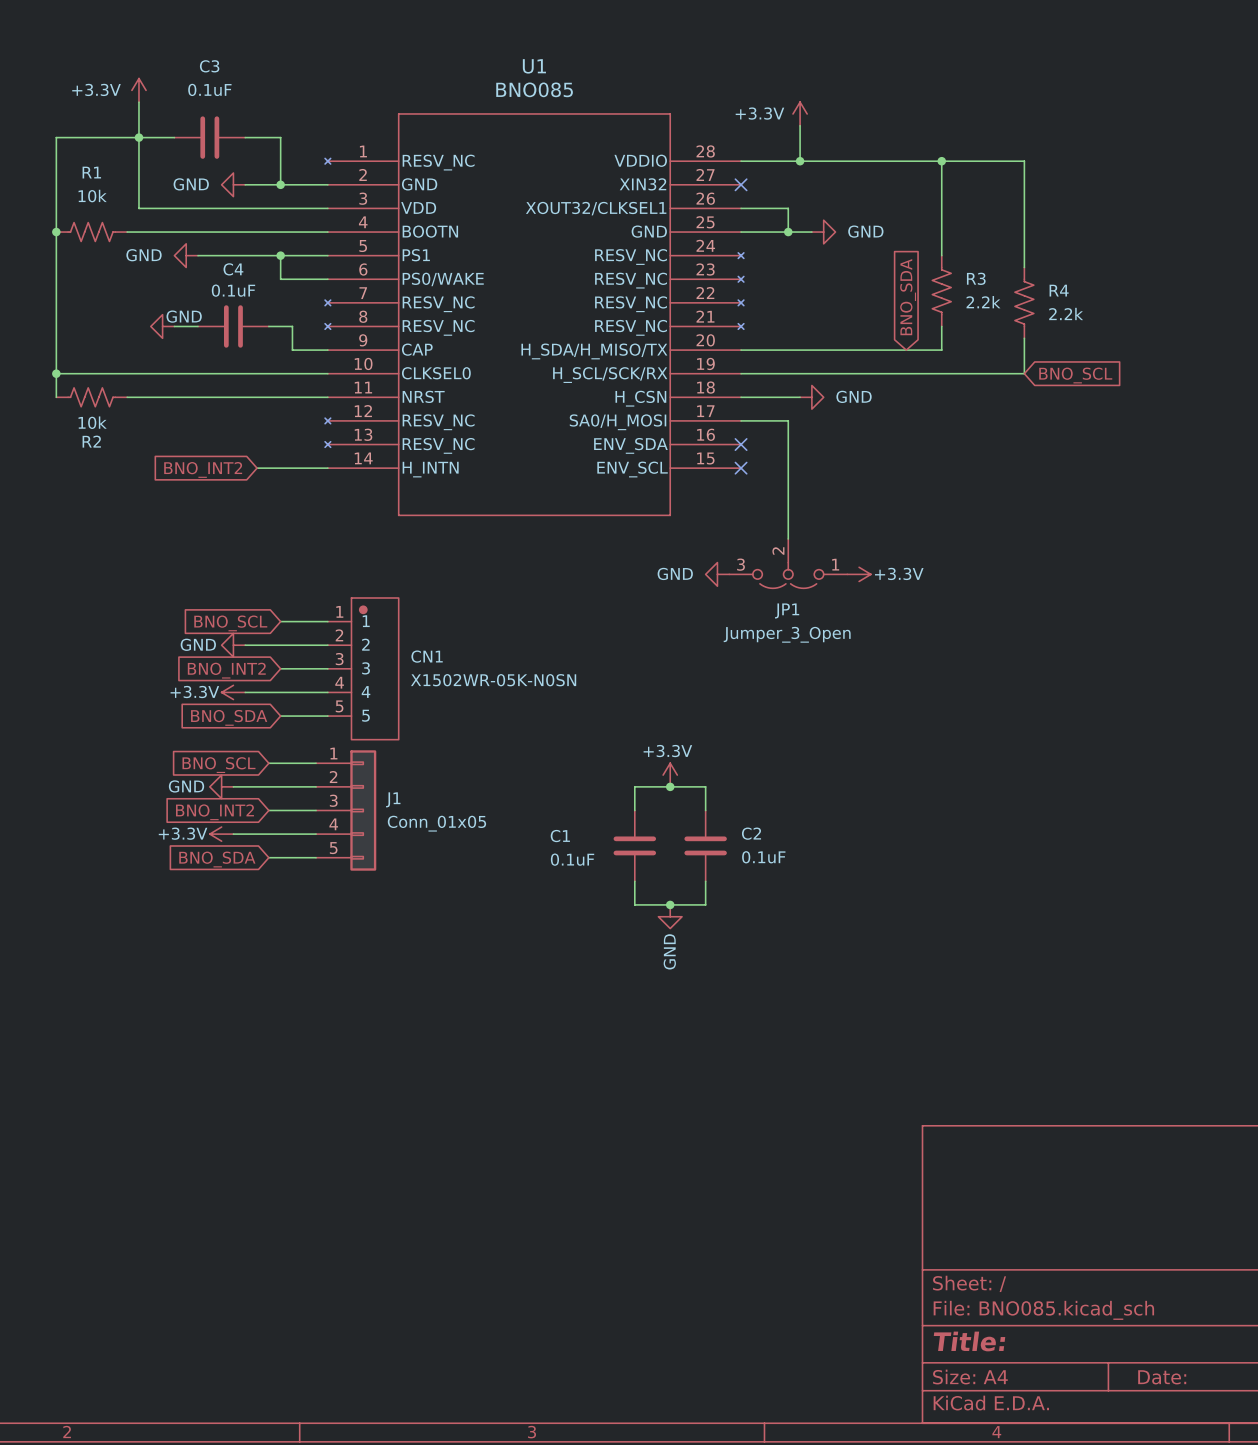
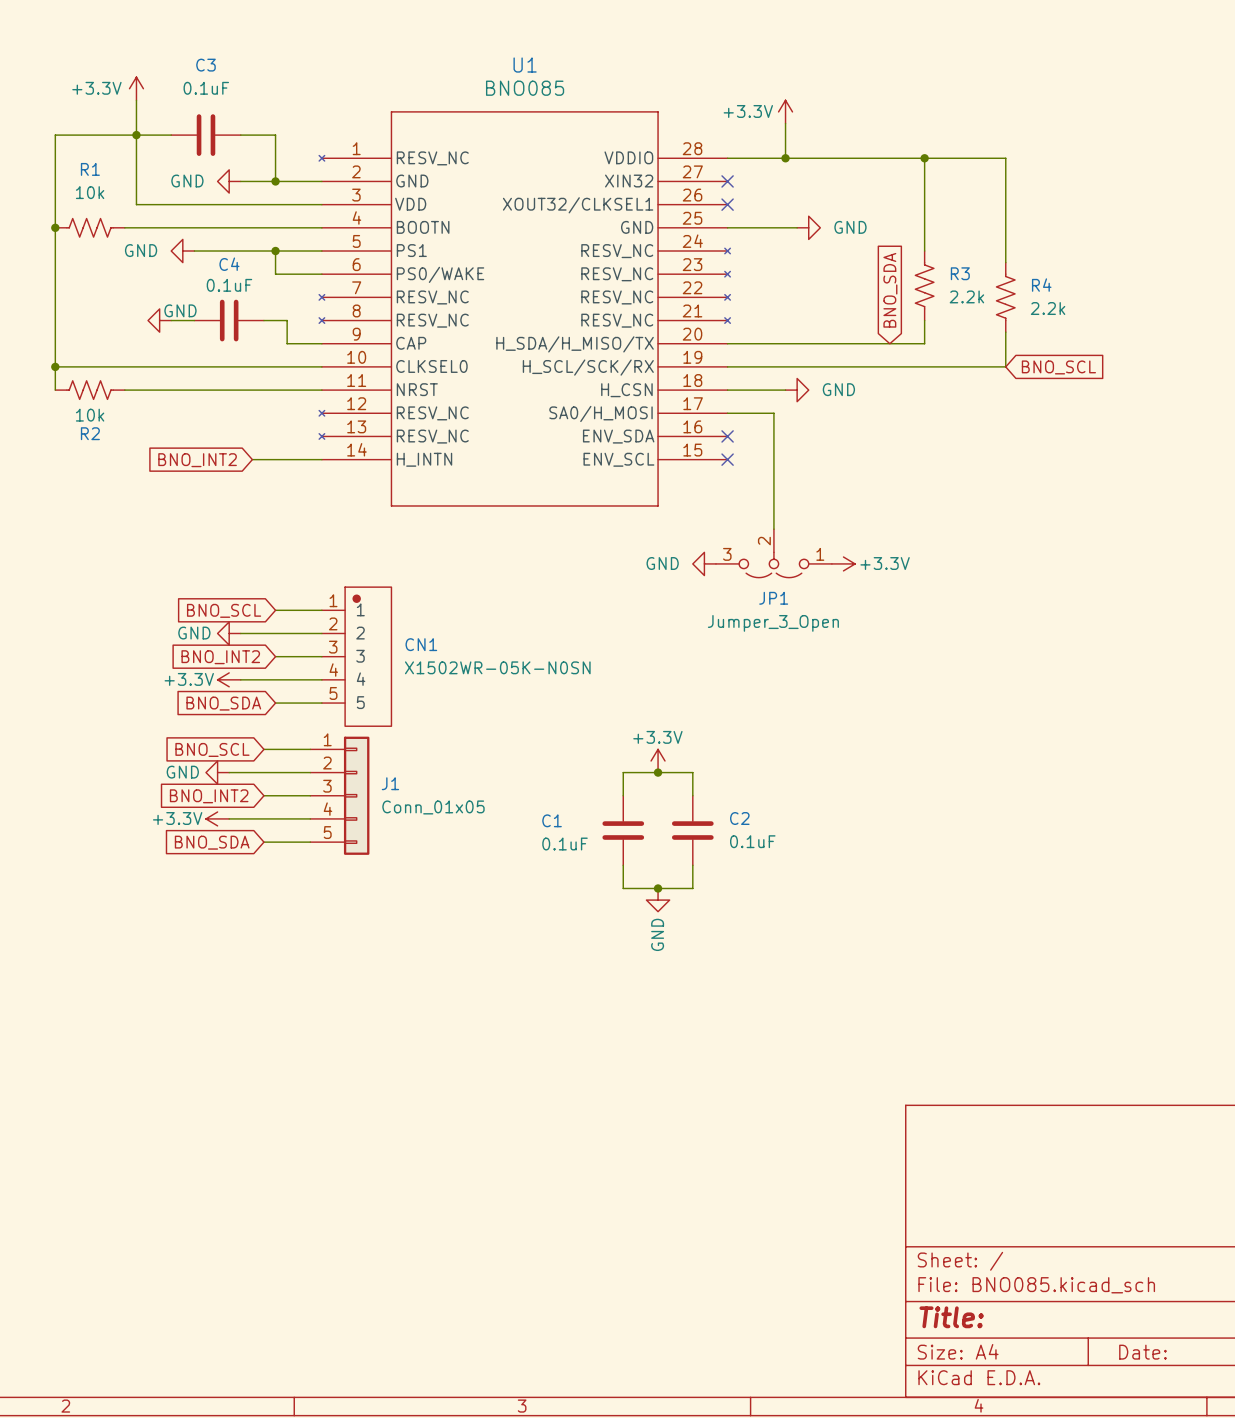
wire: (741, 208) (788, 208) (788, 232) -> none
no-connect mark: none -> (727, 204)
junction: (788, 232) -> none

